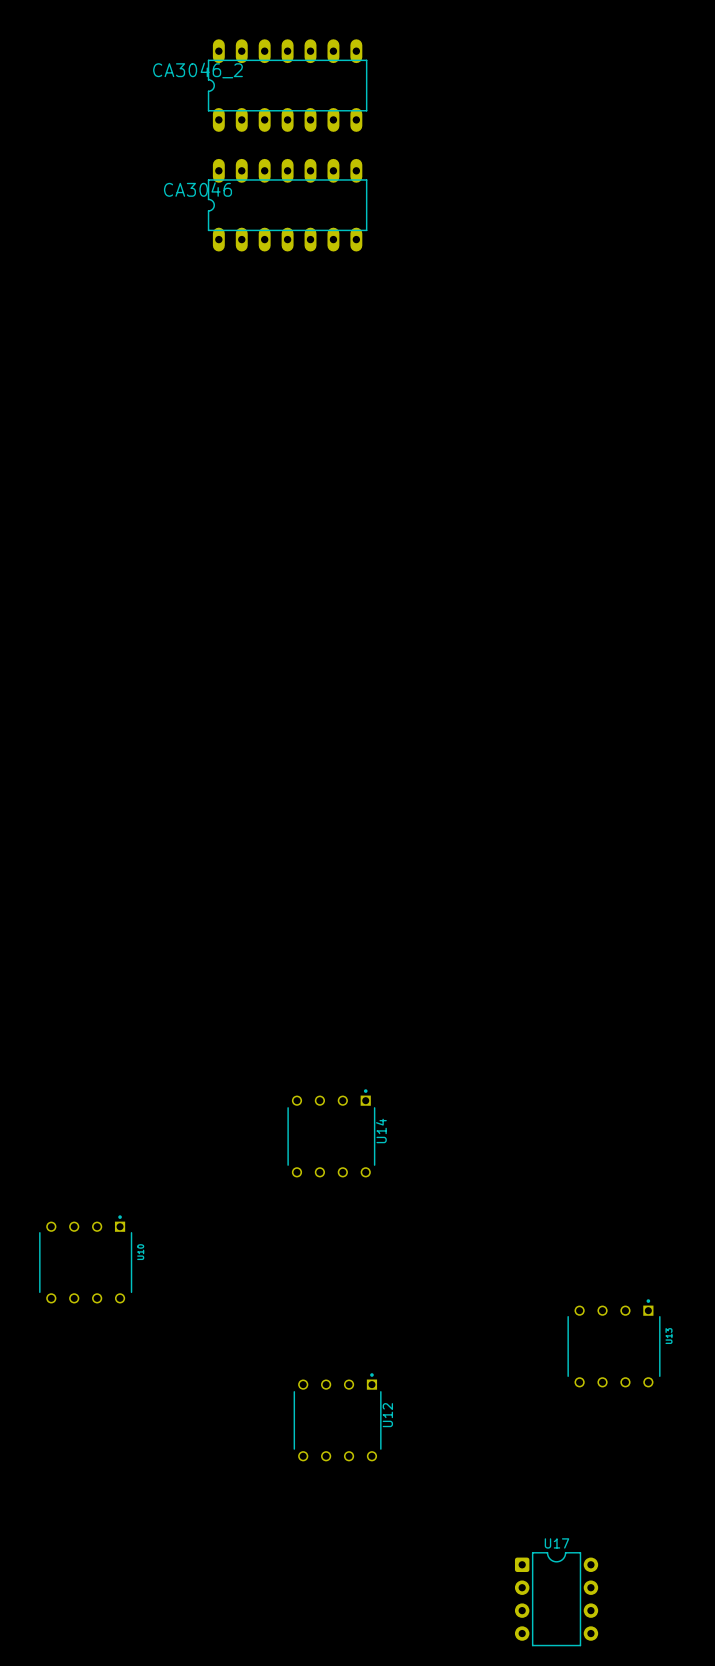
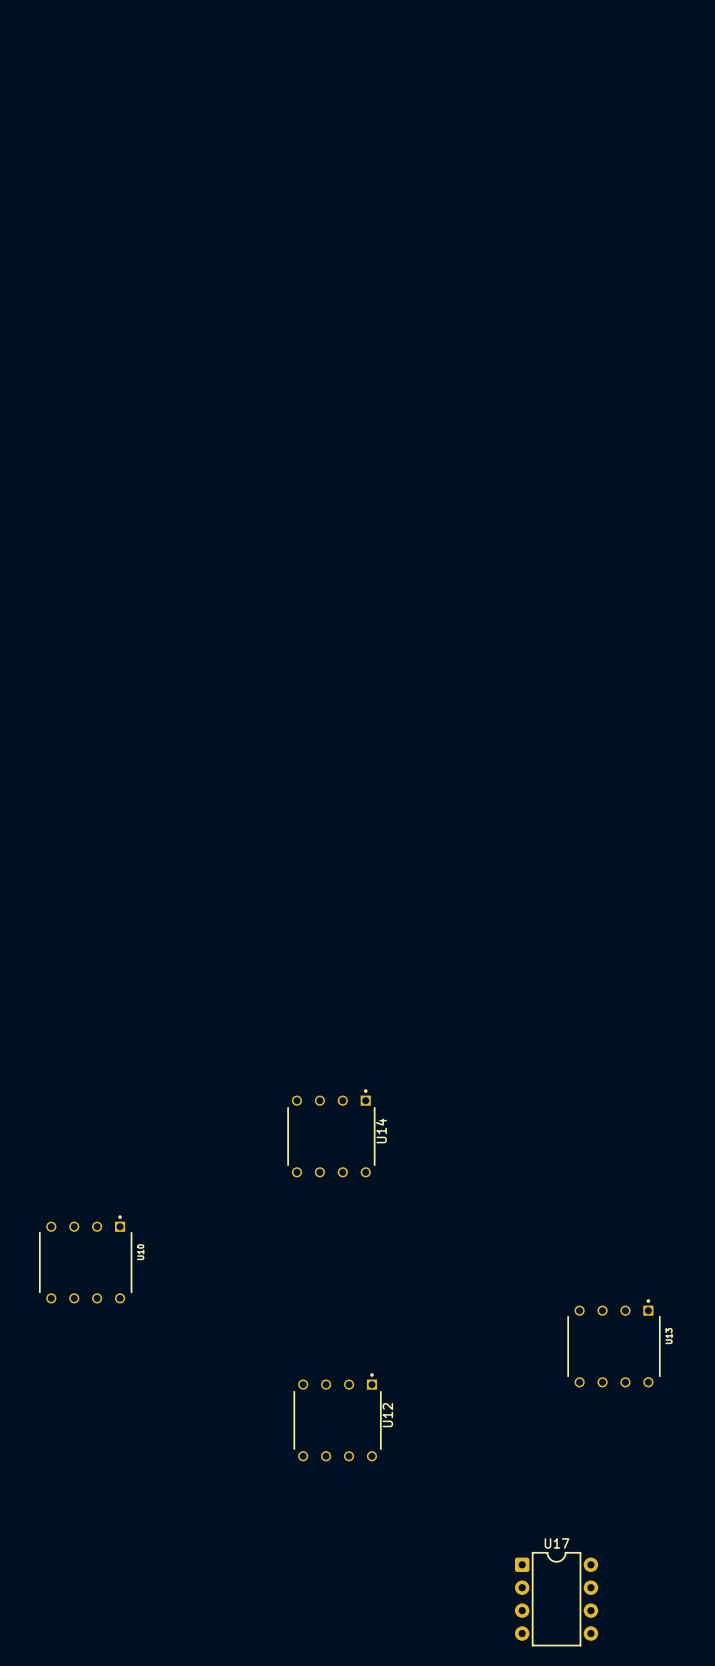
CA3046_2: (287, 85) -> none
CA3046: (287, 205) -> none

